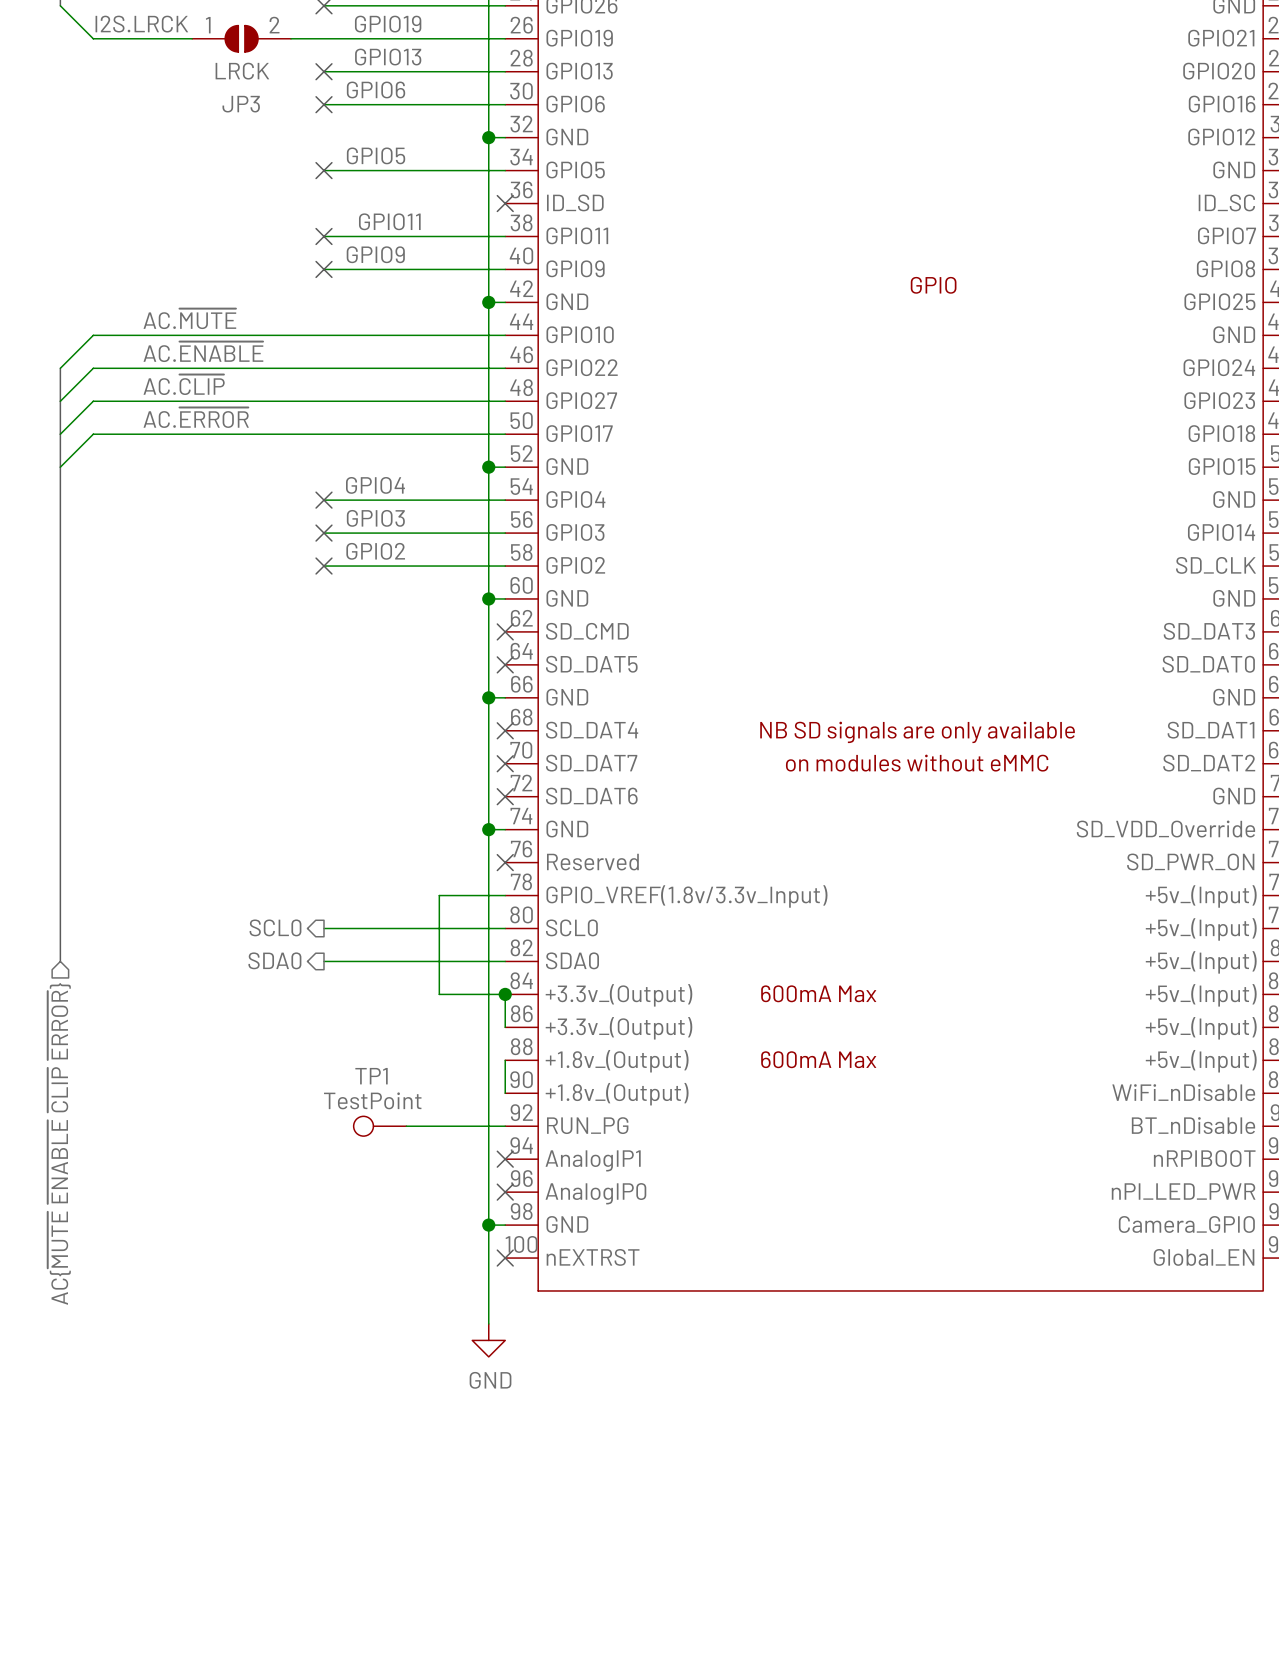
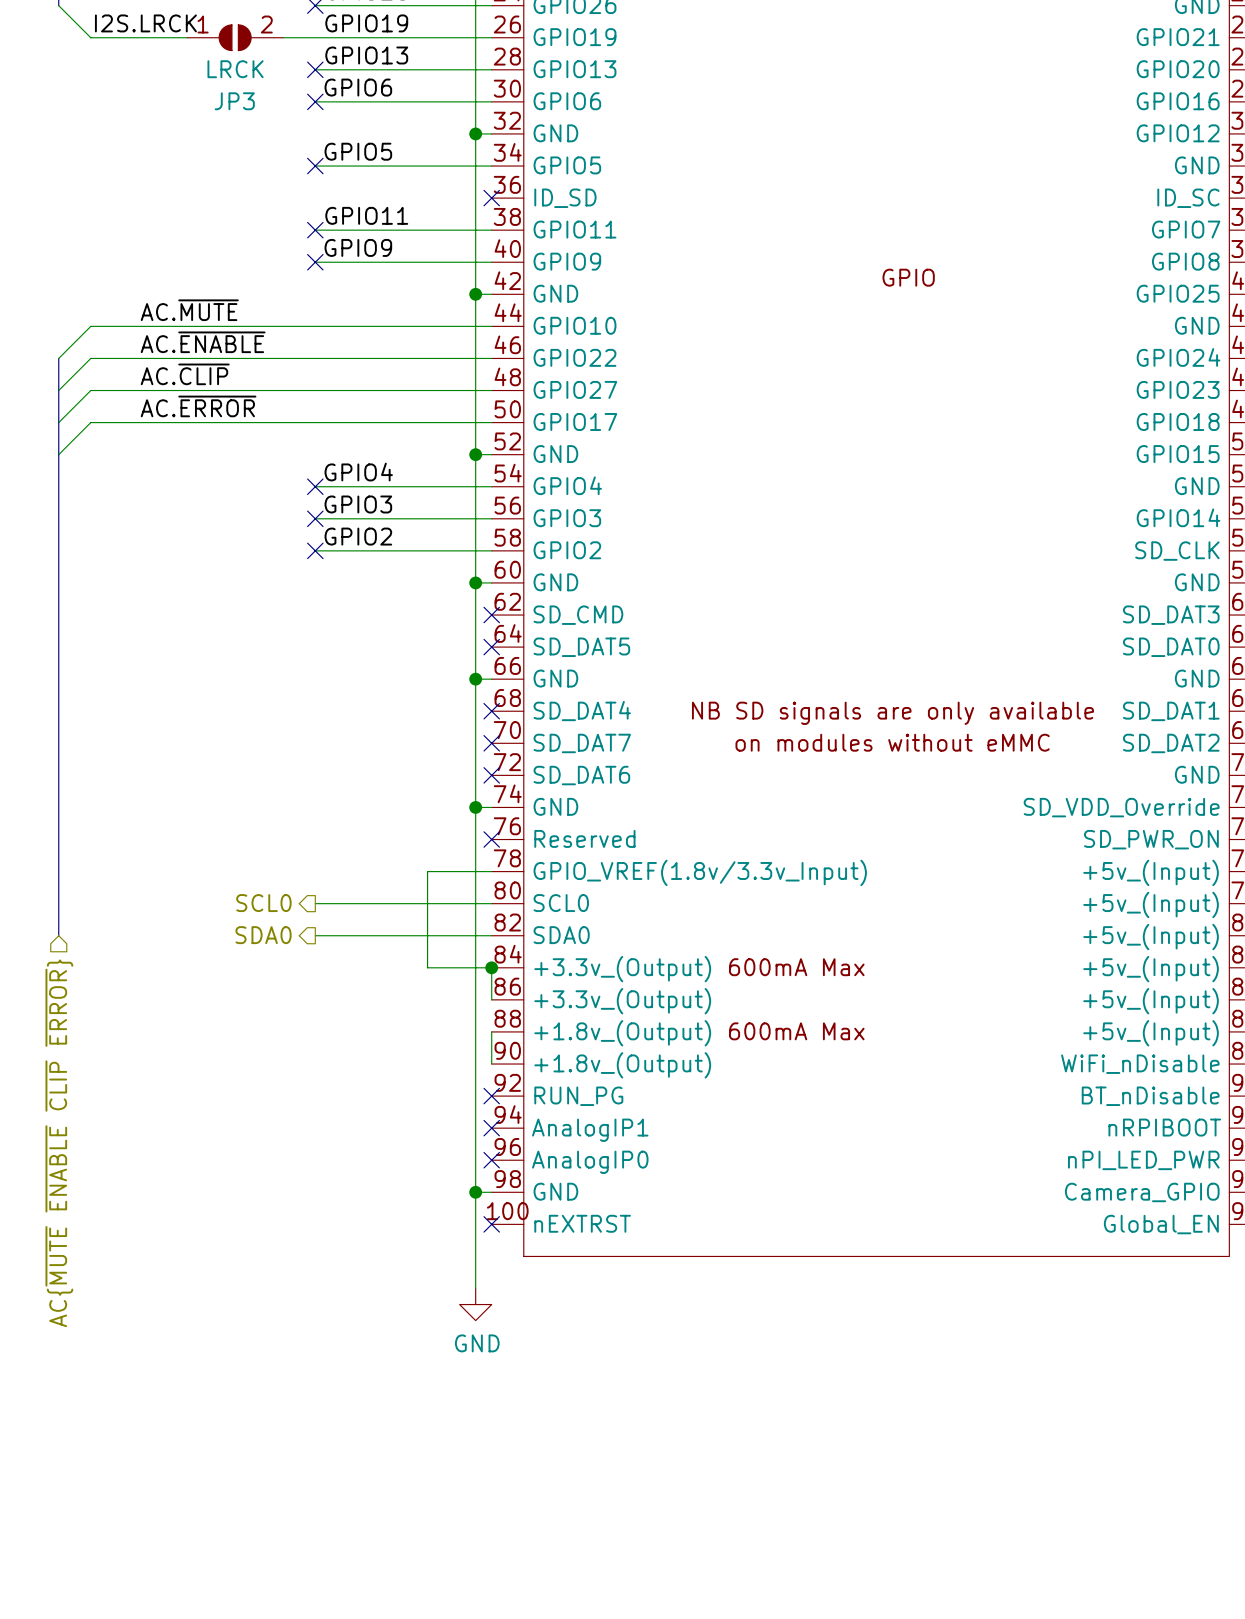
TP1: TestPoint (380, 1126) -> none
wire: (406, 1126) (505, 1126) -> none
no-connect mark: none -> (491, 1096)

